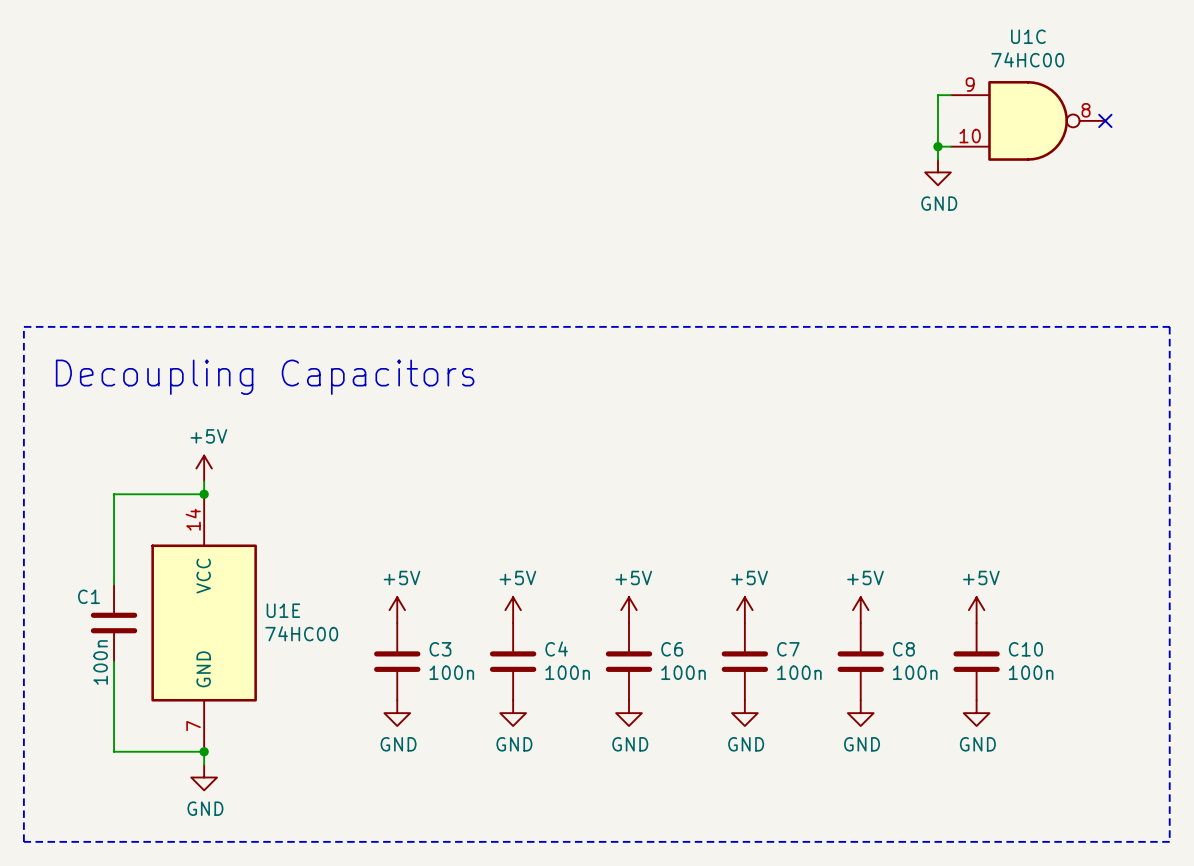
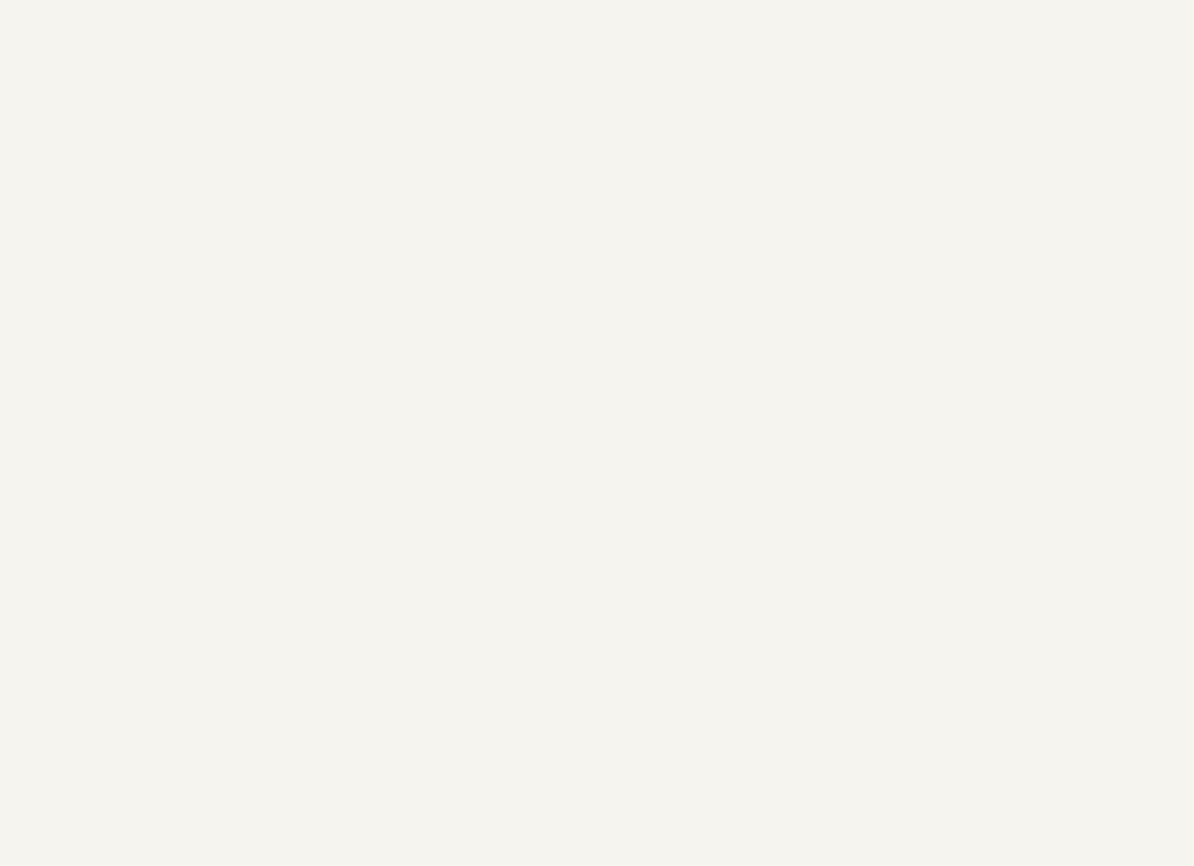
wire: (950, 95) (937, 95) (937, 159) -> none
U1C: 74HC00 (1028, 120) -> none
no-connect mark: (1105, 120) -> none
wire: (937, 146) (950, 146) -> none
junction: (937, 146) -> none
power symbol: GND (937, 172) -> none
line: (23, 326) (23, 841) (1169, 841) (1169, 326) (23, 326) -> none
text: Decoupling Capacitors (265, 377) -> none
power symbol: +5V (204, 468) -> none
wire: (204, 481) (204, 494) (114, 494) (114, 584) -> none
junction: (204, 494) -> none
power symbol: +5V (397, 610) -> none
power symbol: +5V (513, 610) -> none
power symbol: +5V (629, 610) -> none
power symbol: +5V (744, 610) -> none
power symbol: +5V (860, 610) -> none
power symbol: +5V (976, 610) -> none
C1: 100n (114, 623) -> none
U1E: 74HC00 (204, 623) -> none
wire: (114, 661) (114, 751) (204, 751) (204, 764) -> none
C3: 100n (397, 661) -> none
C4: 100n (513, 661) -> none
C6: 100n (629, 661) -> none
C7: 100n (744, 661) -> none
C8: 100n (860, 661) -> none
C10: 100n (976, 661) -> none
power symbol: GND (397, 713) -> none
power symbol: GND (513, 713) -> none
power symbol: GND (629, 713) -> none
power symbol: GND (744, 713) -> none
power symbol: GND (860, 713) -> none
power symbol: GND (976, 713) -> none
junction: (204, 751) -> none
power symbol: GND (204, 777) -> none

